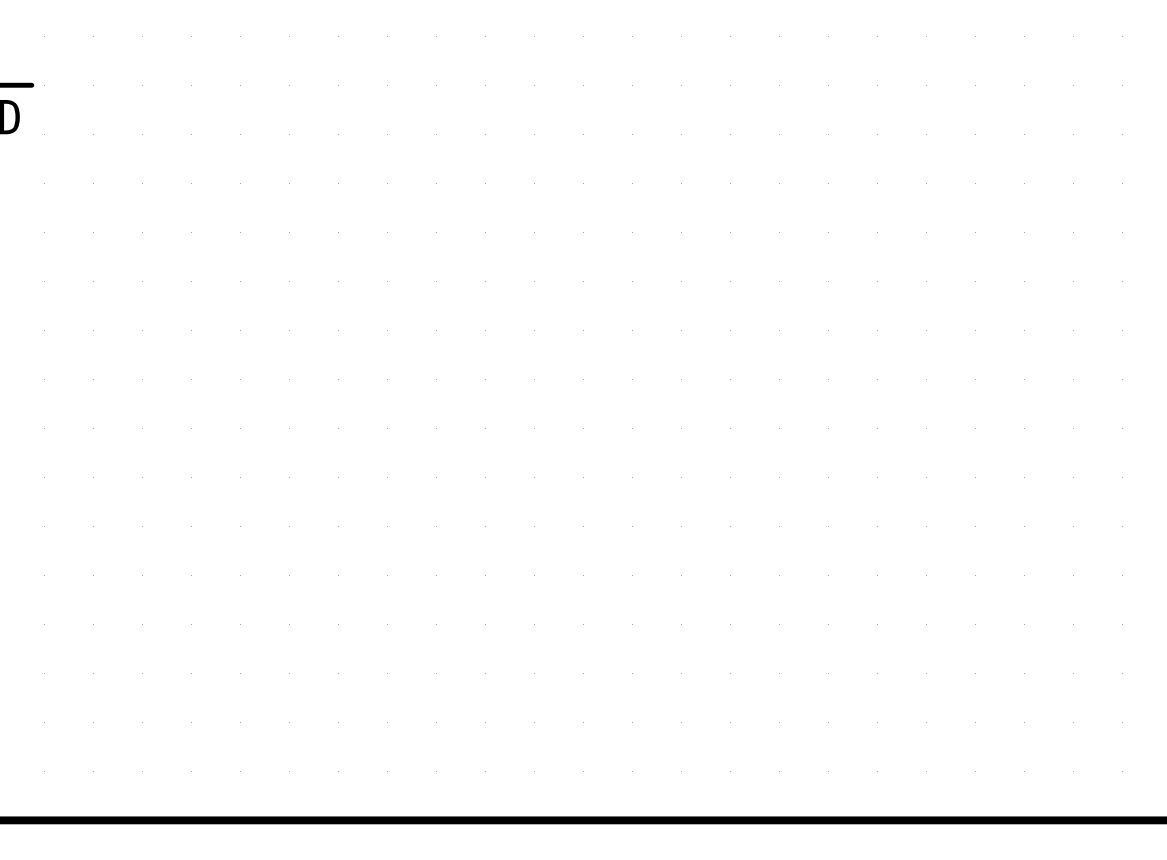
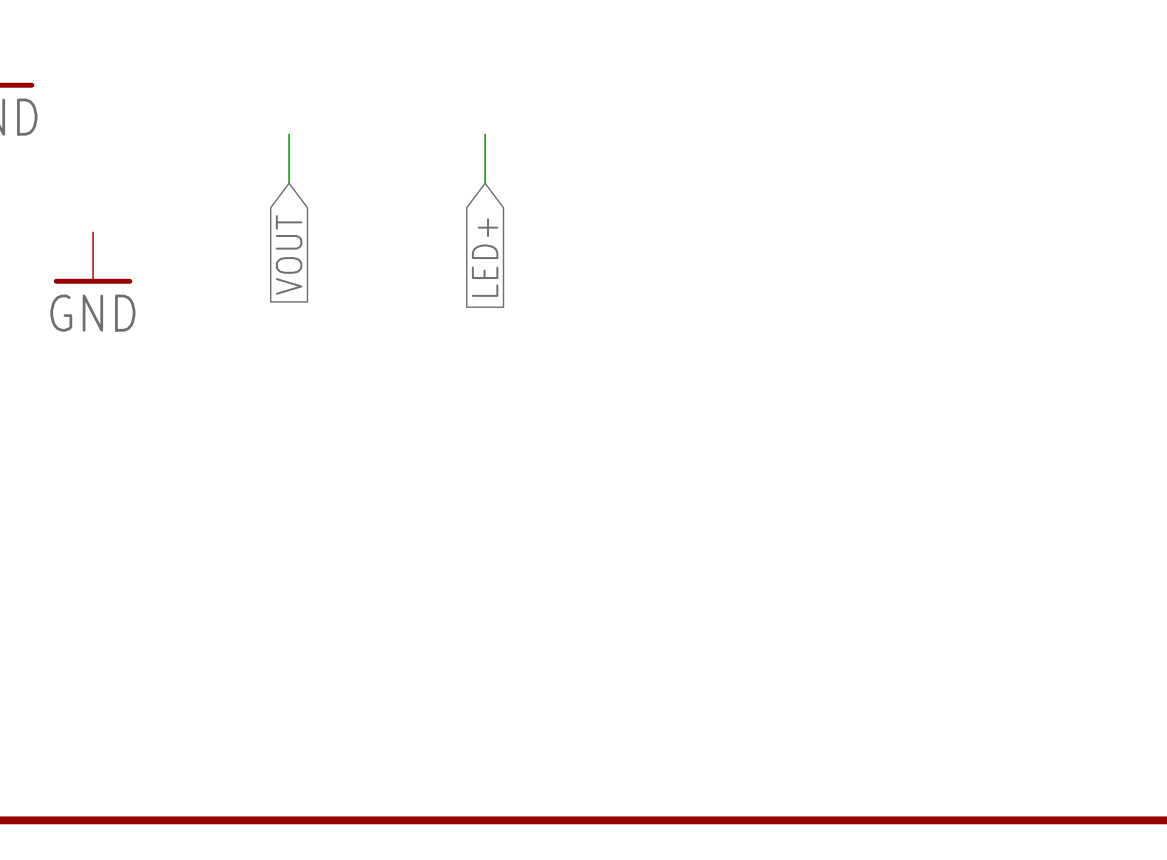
wire: none -> (289, 134) (289, 183)
wire: none -> (485, 134) (485, 183)
global label: none -> LED+ (485, 257)
global label: none -> VOUT (289, 254)
power symbol: none -> GND (93, 258)

